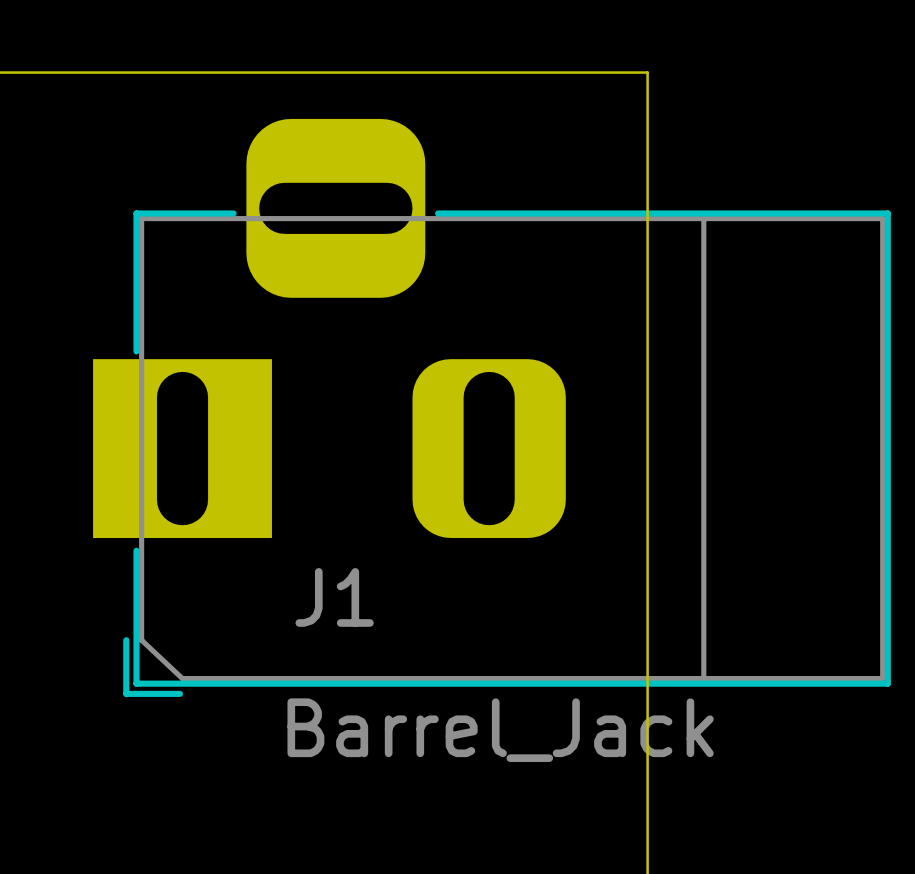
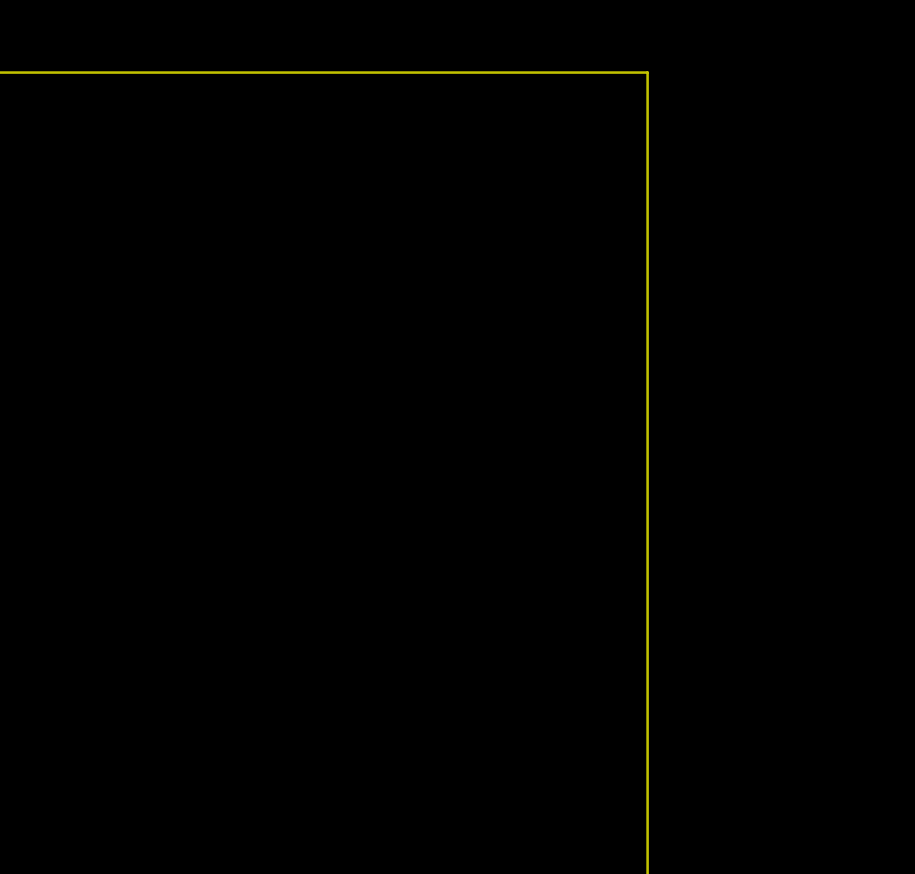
J1: Barrel_Jack (491, 407) -> none

